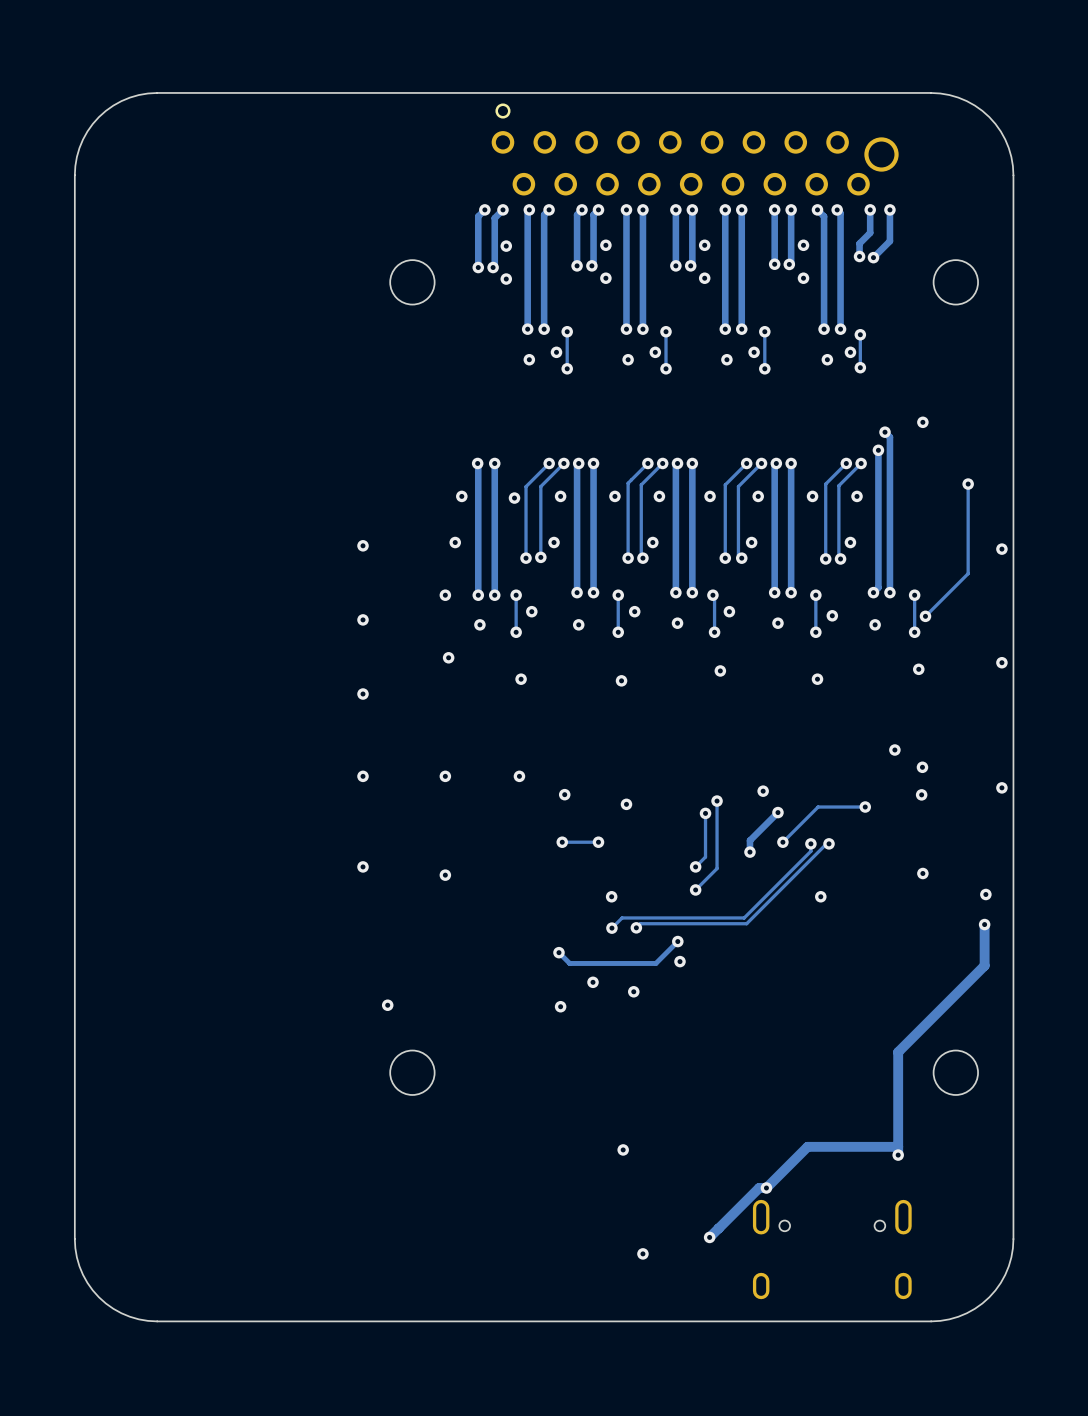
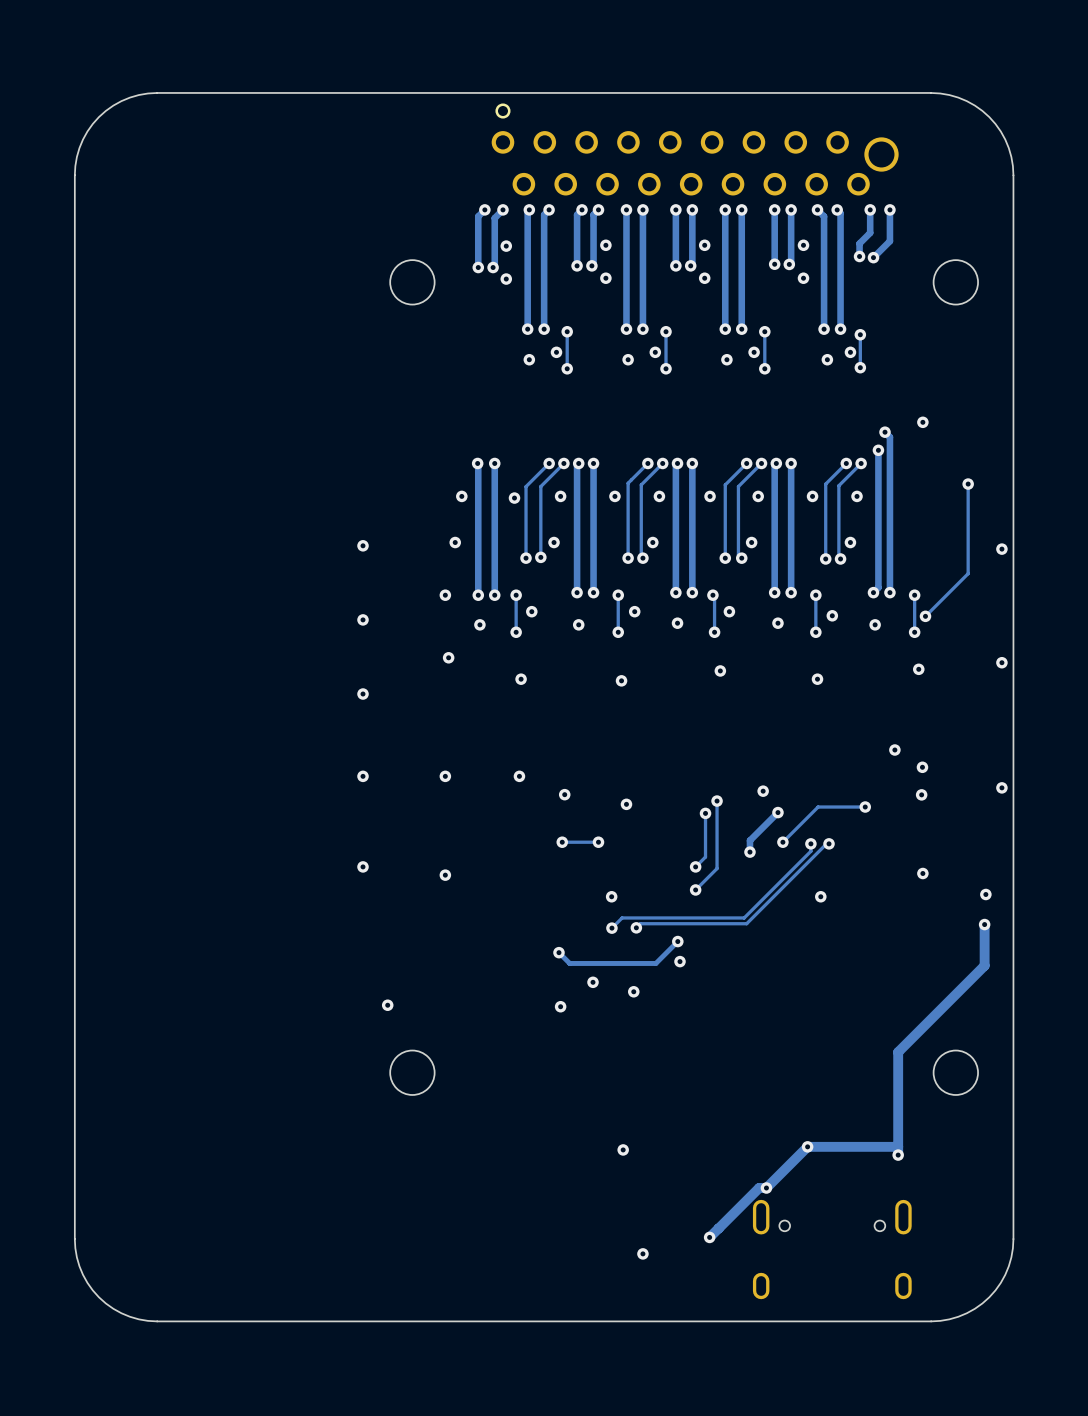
via: none -> (807, 1146)

